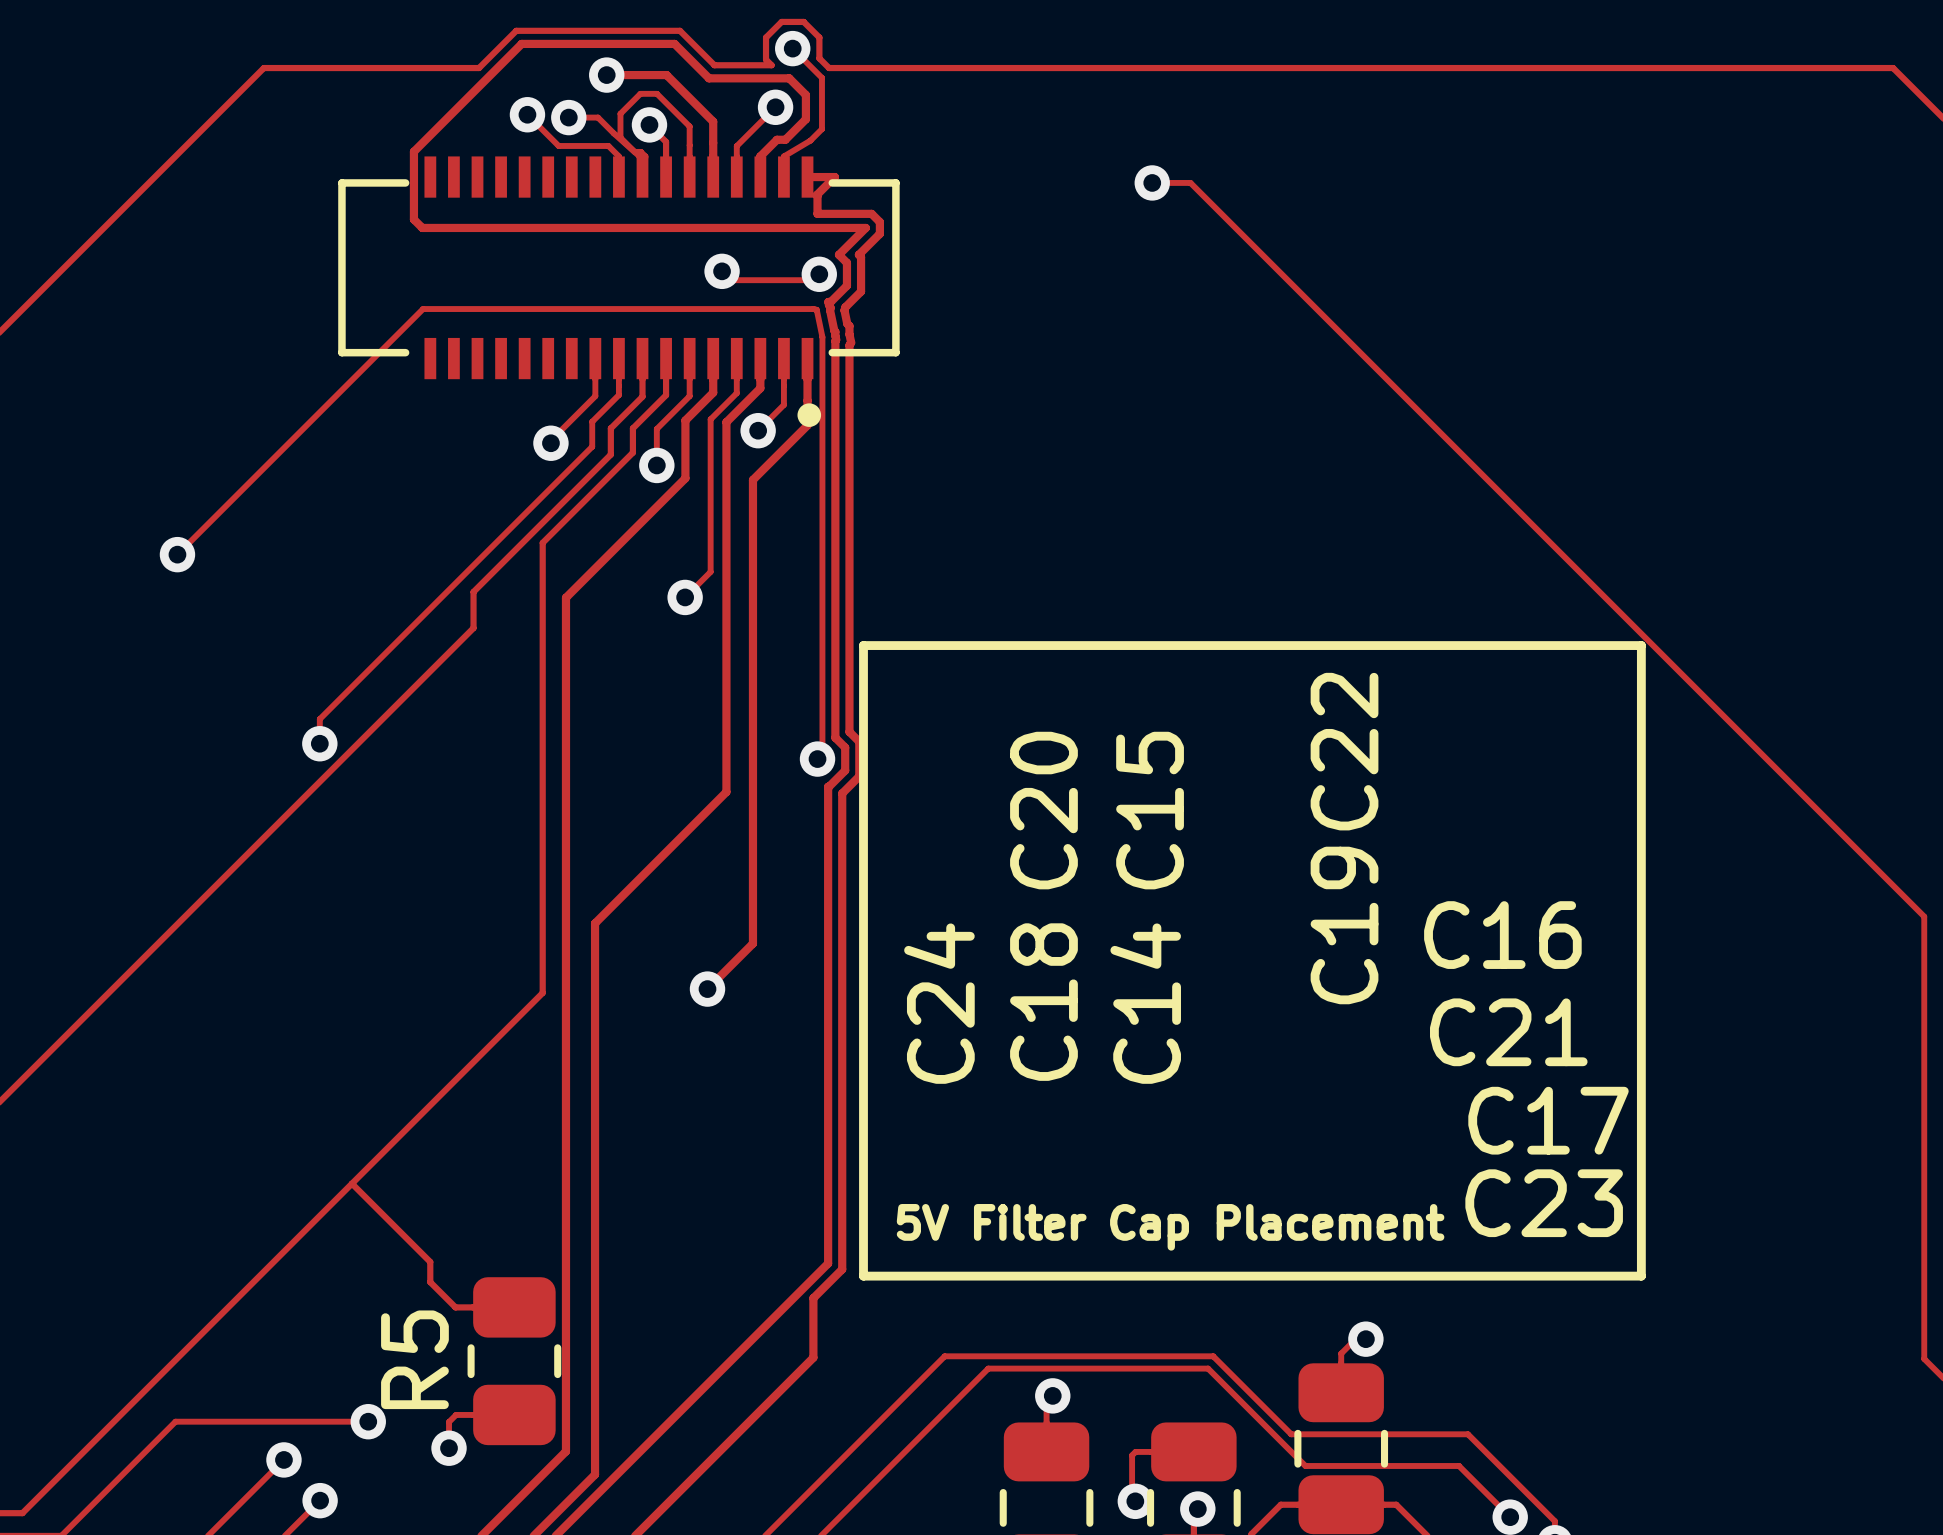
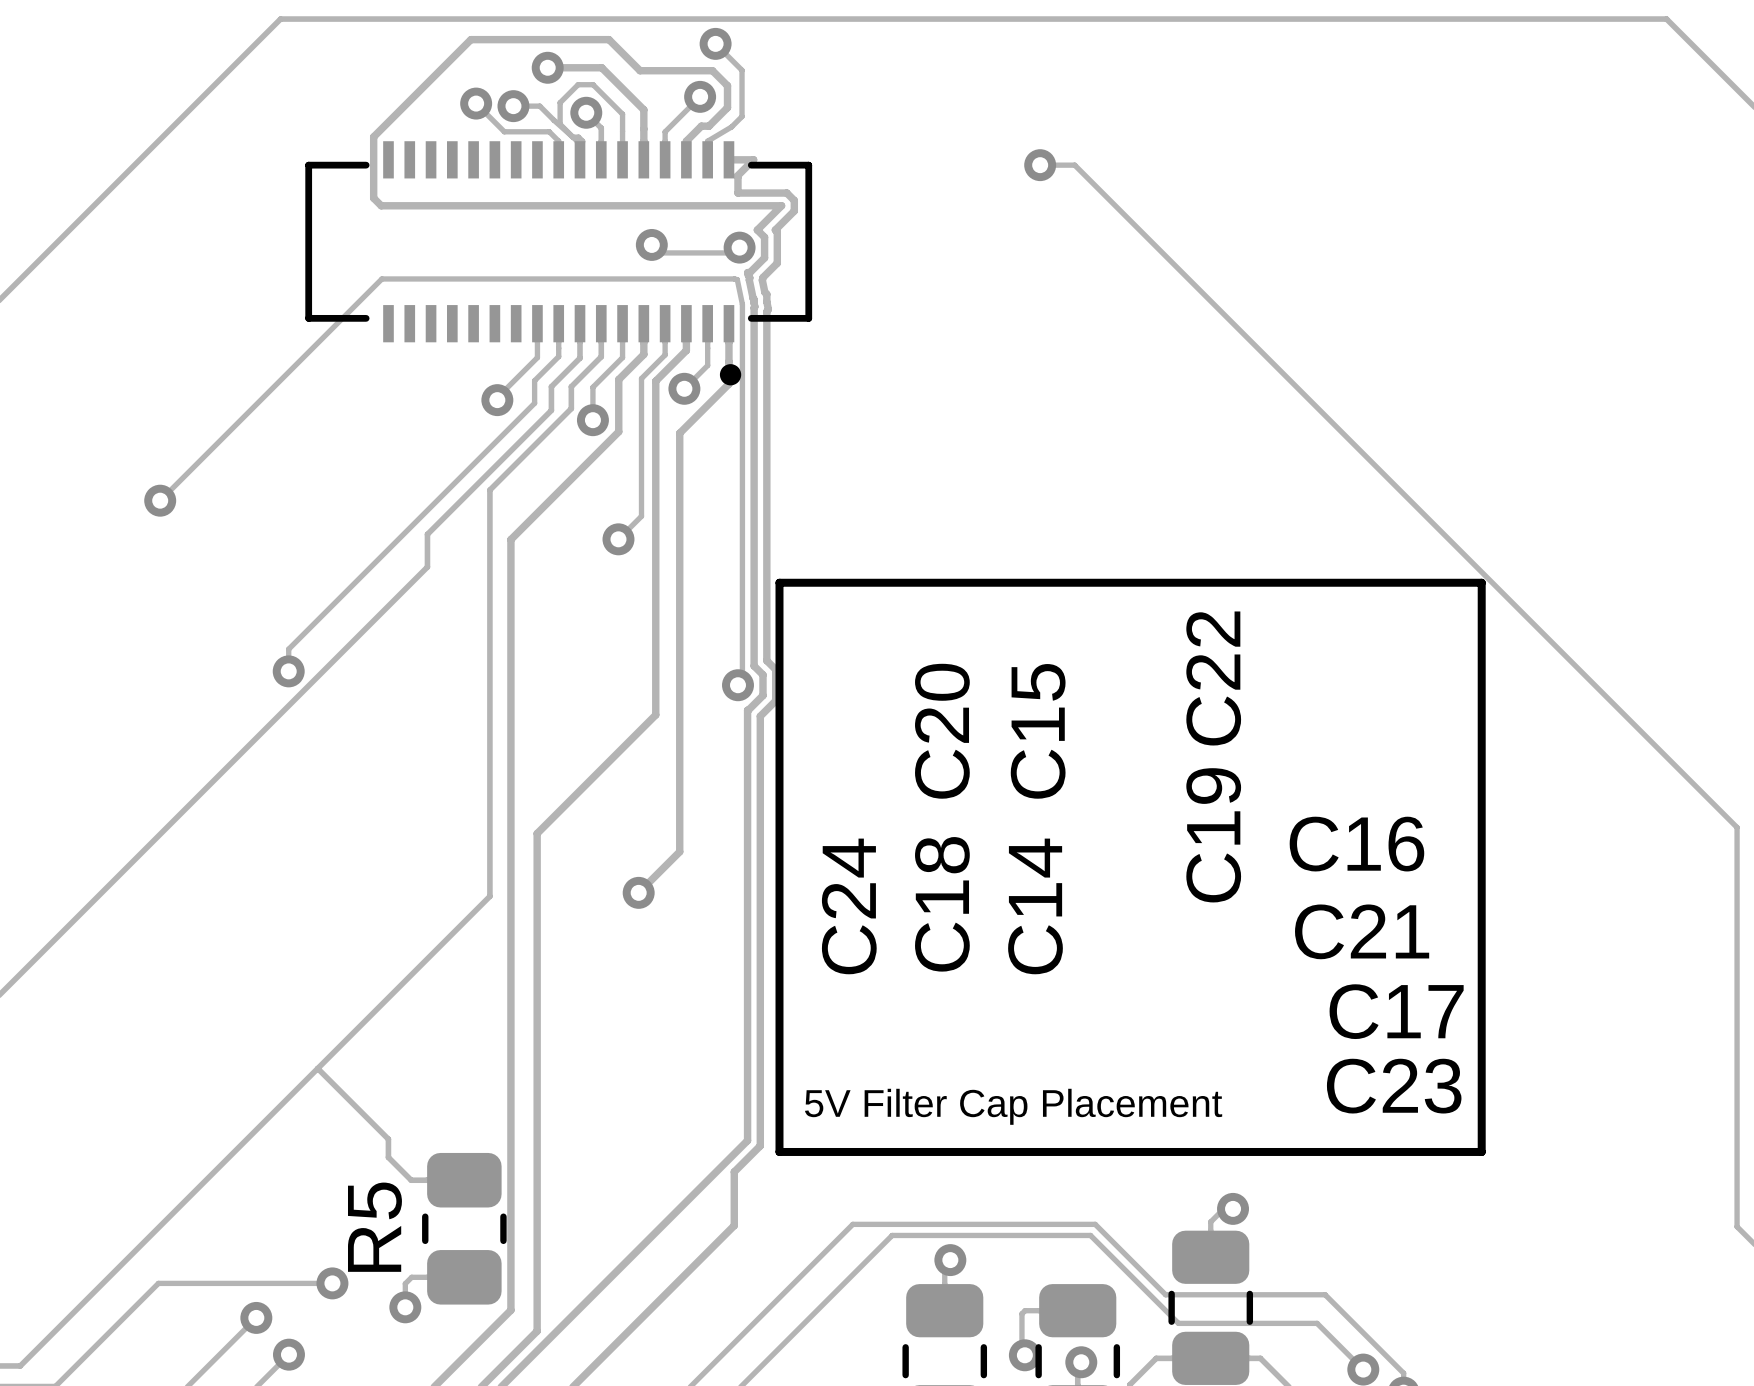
track: (263, 68) (479, 68) (516, 30) (680, 30) (714, 65) (771, 65) (766, 59) (766, 37) (781, 21) (803, 21) (819, 37) (819, 58) (829, 68) (1893, 68) -> (238, 61) (280, 19) (1666, 19) (1708, 61)

